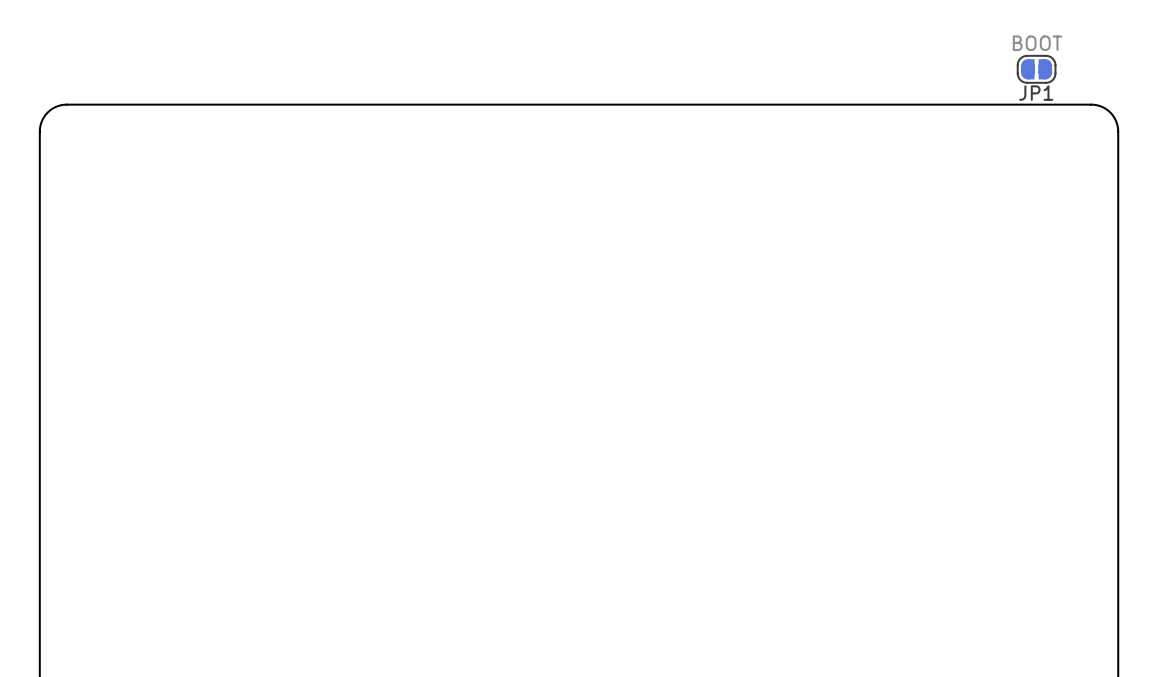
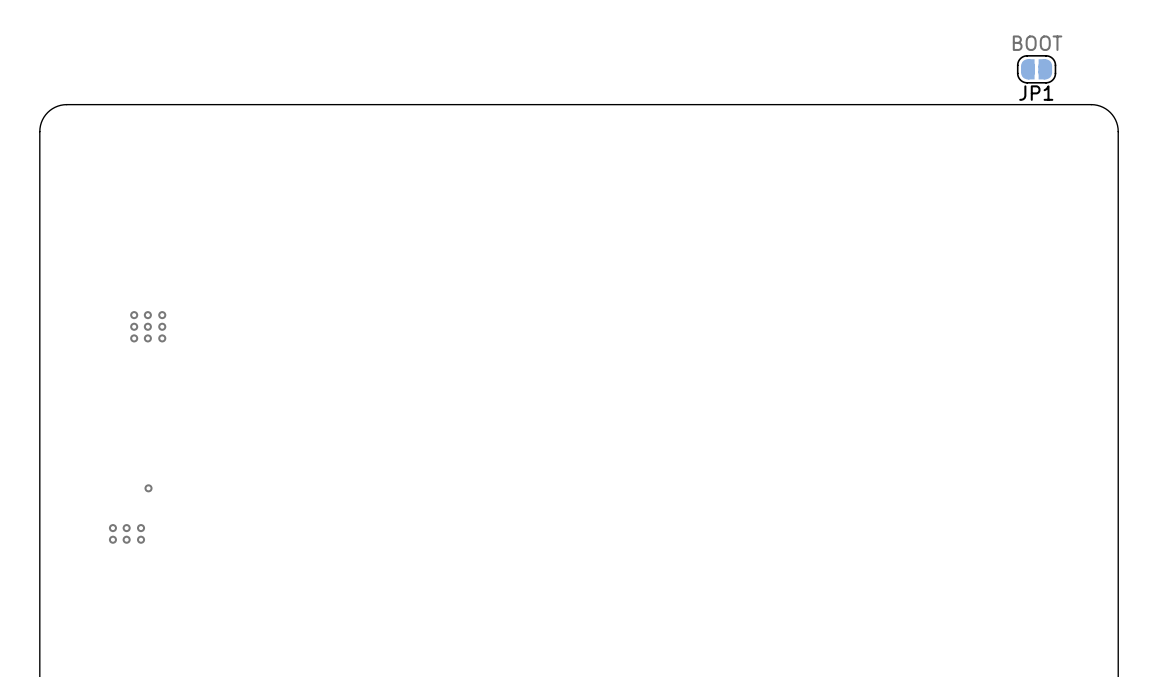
via: none -> (134, 315)
via: none -> (147, 315)
via: none -> (162, 315)
via: none -> (134, 326)
via: none -> (147, 326)
via: none -> (162, 326)
via: none -> (134, 338)
via: none -> (147, 338)
via: none -> (162, 338)
via: none -> (148, 488)
via: none -> (112, 528)
via: none -> (126, 528)
via: none -> (141, 528)
via: none -> (112, 539)
via: none -> (126, 539)
via: none -> (141, 539)

